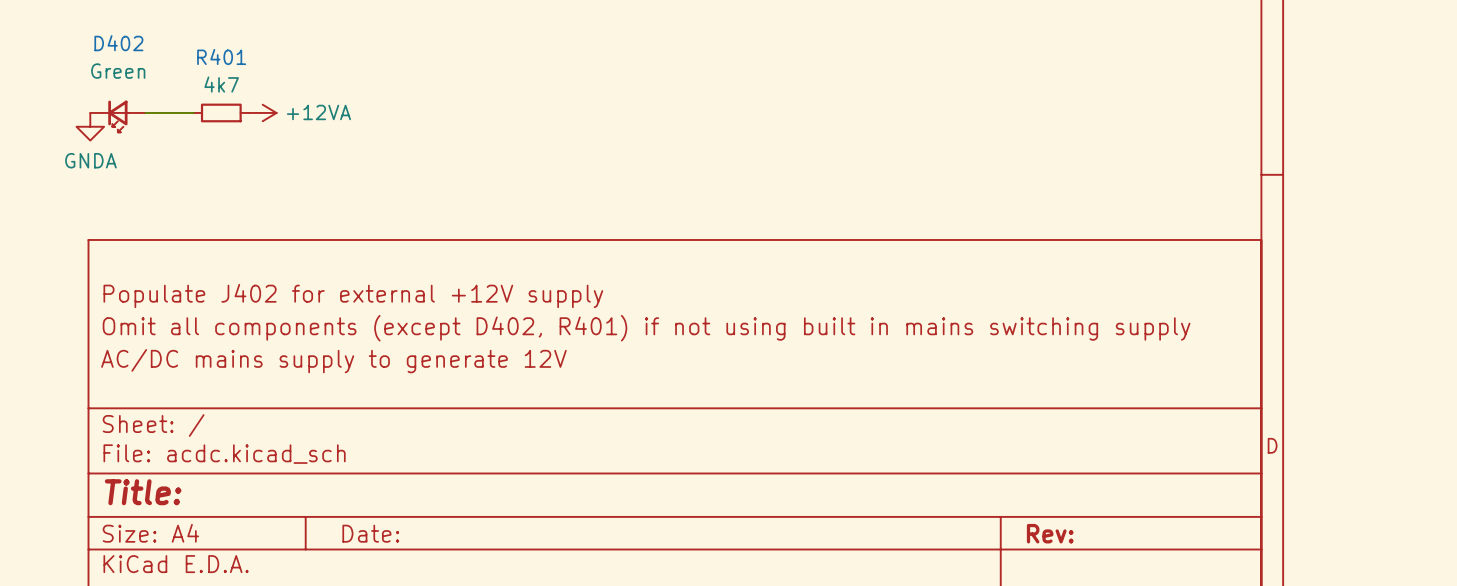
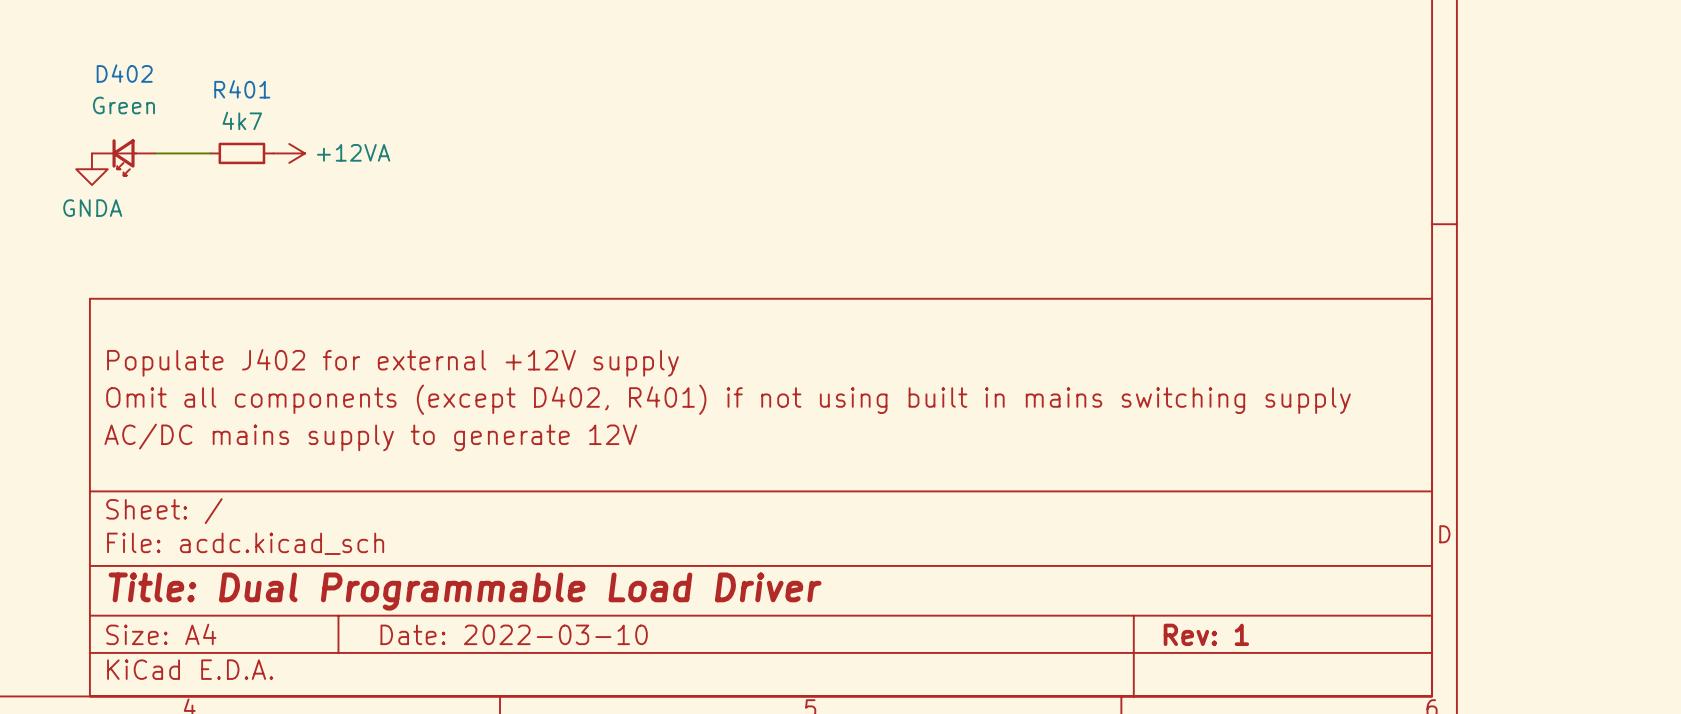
title block: Title: (143, 492) -> Title: Dual Programmable Load Driver (465, 591)
title block: Date: (370, 533) -> Date: 2022-03-10 (514, 634)
title block: Rev: (1050, 533) -> Rev: 1 (1206, 634)

